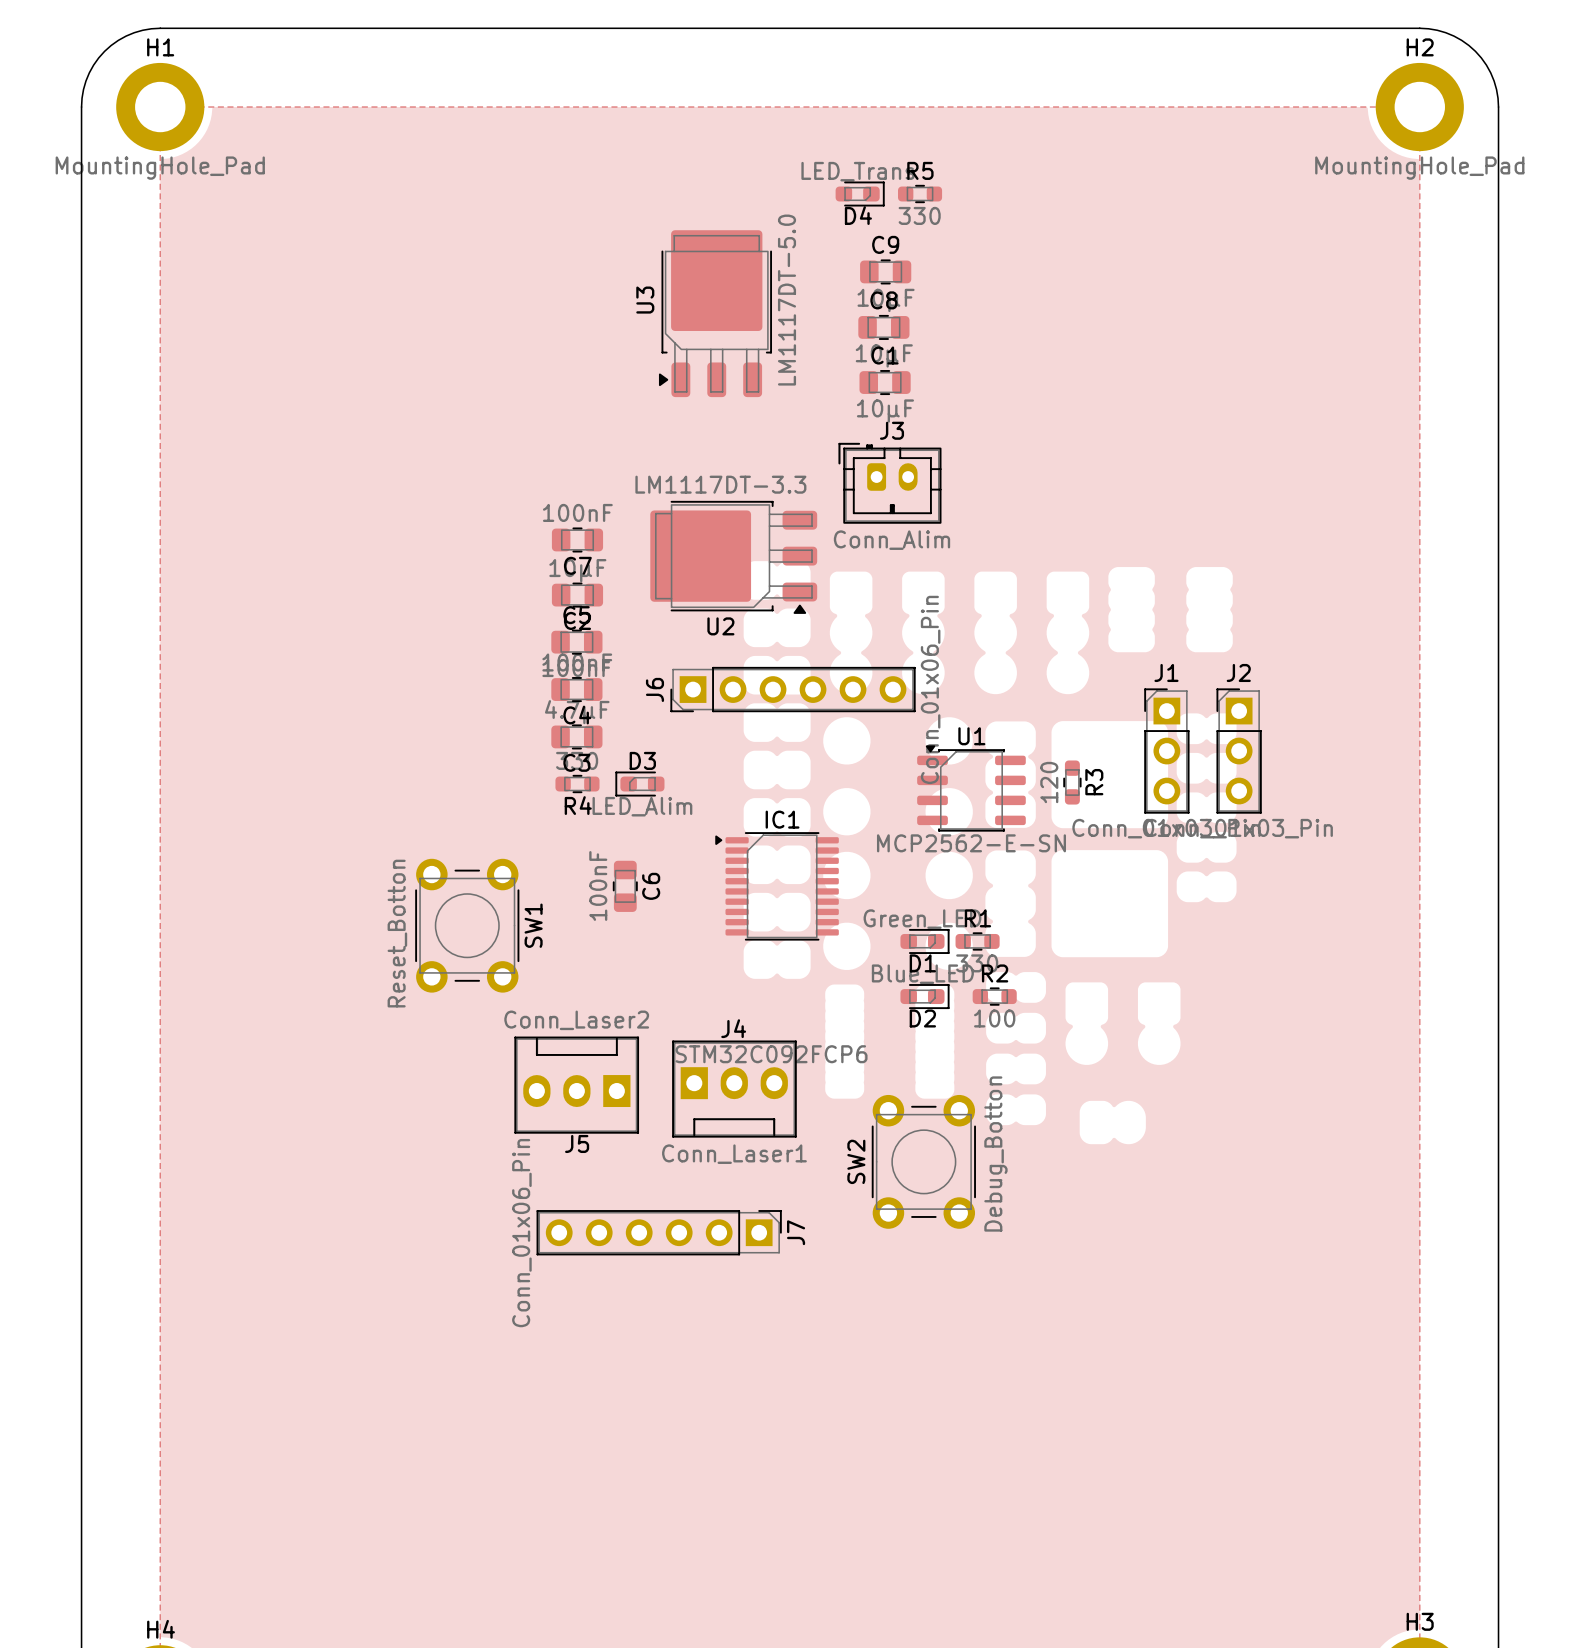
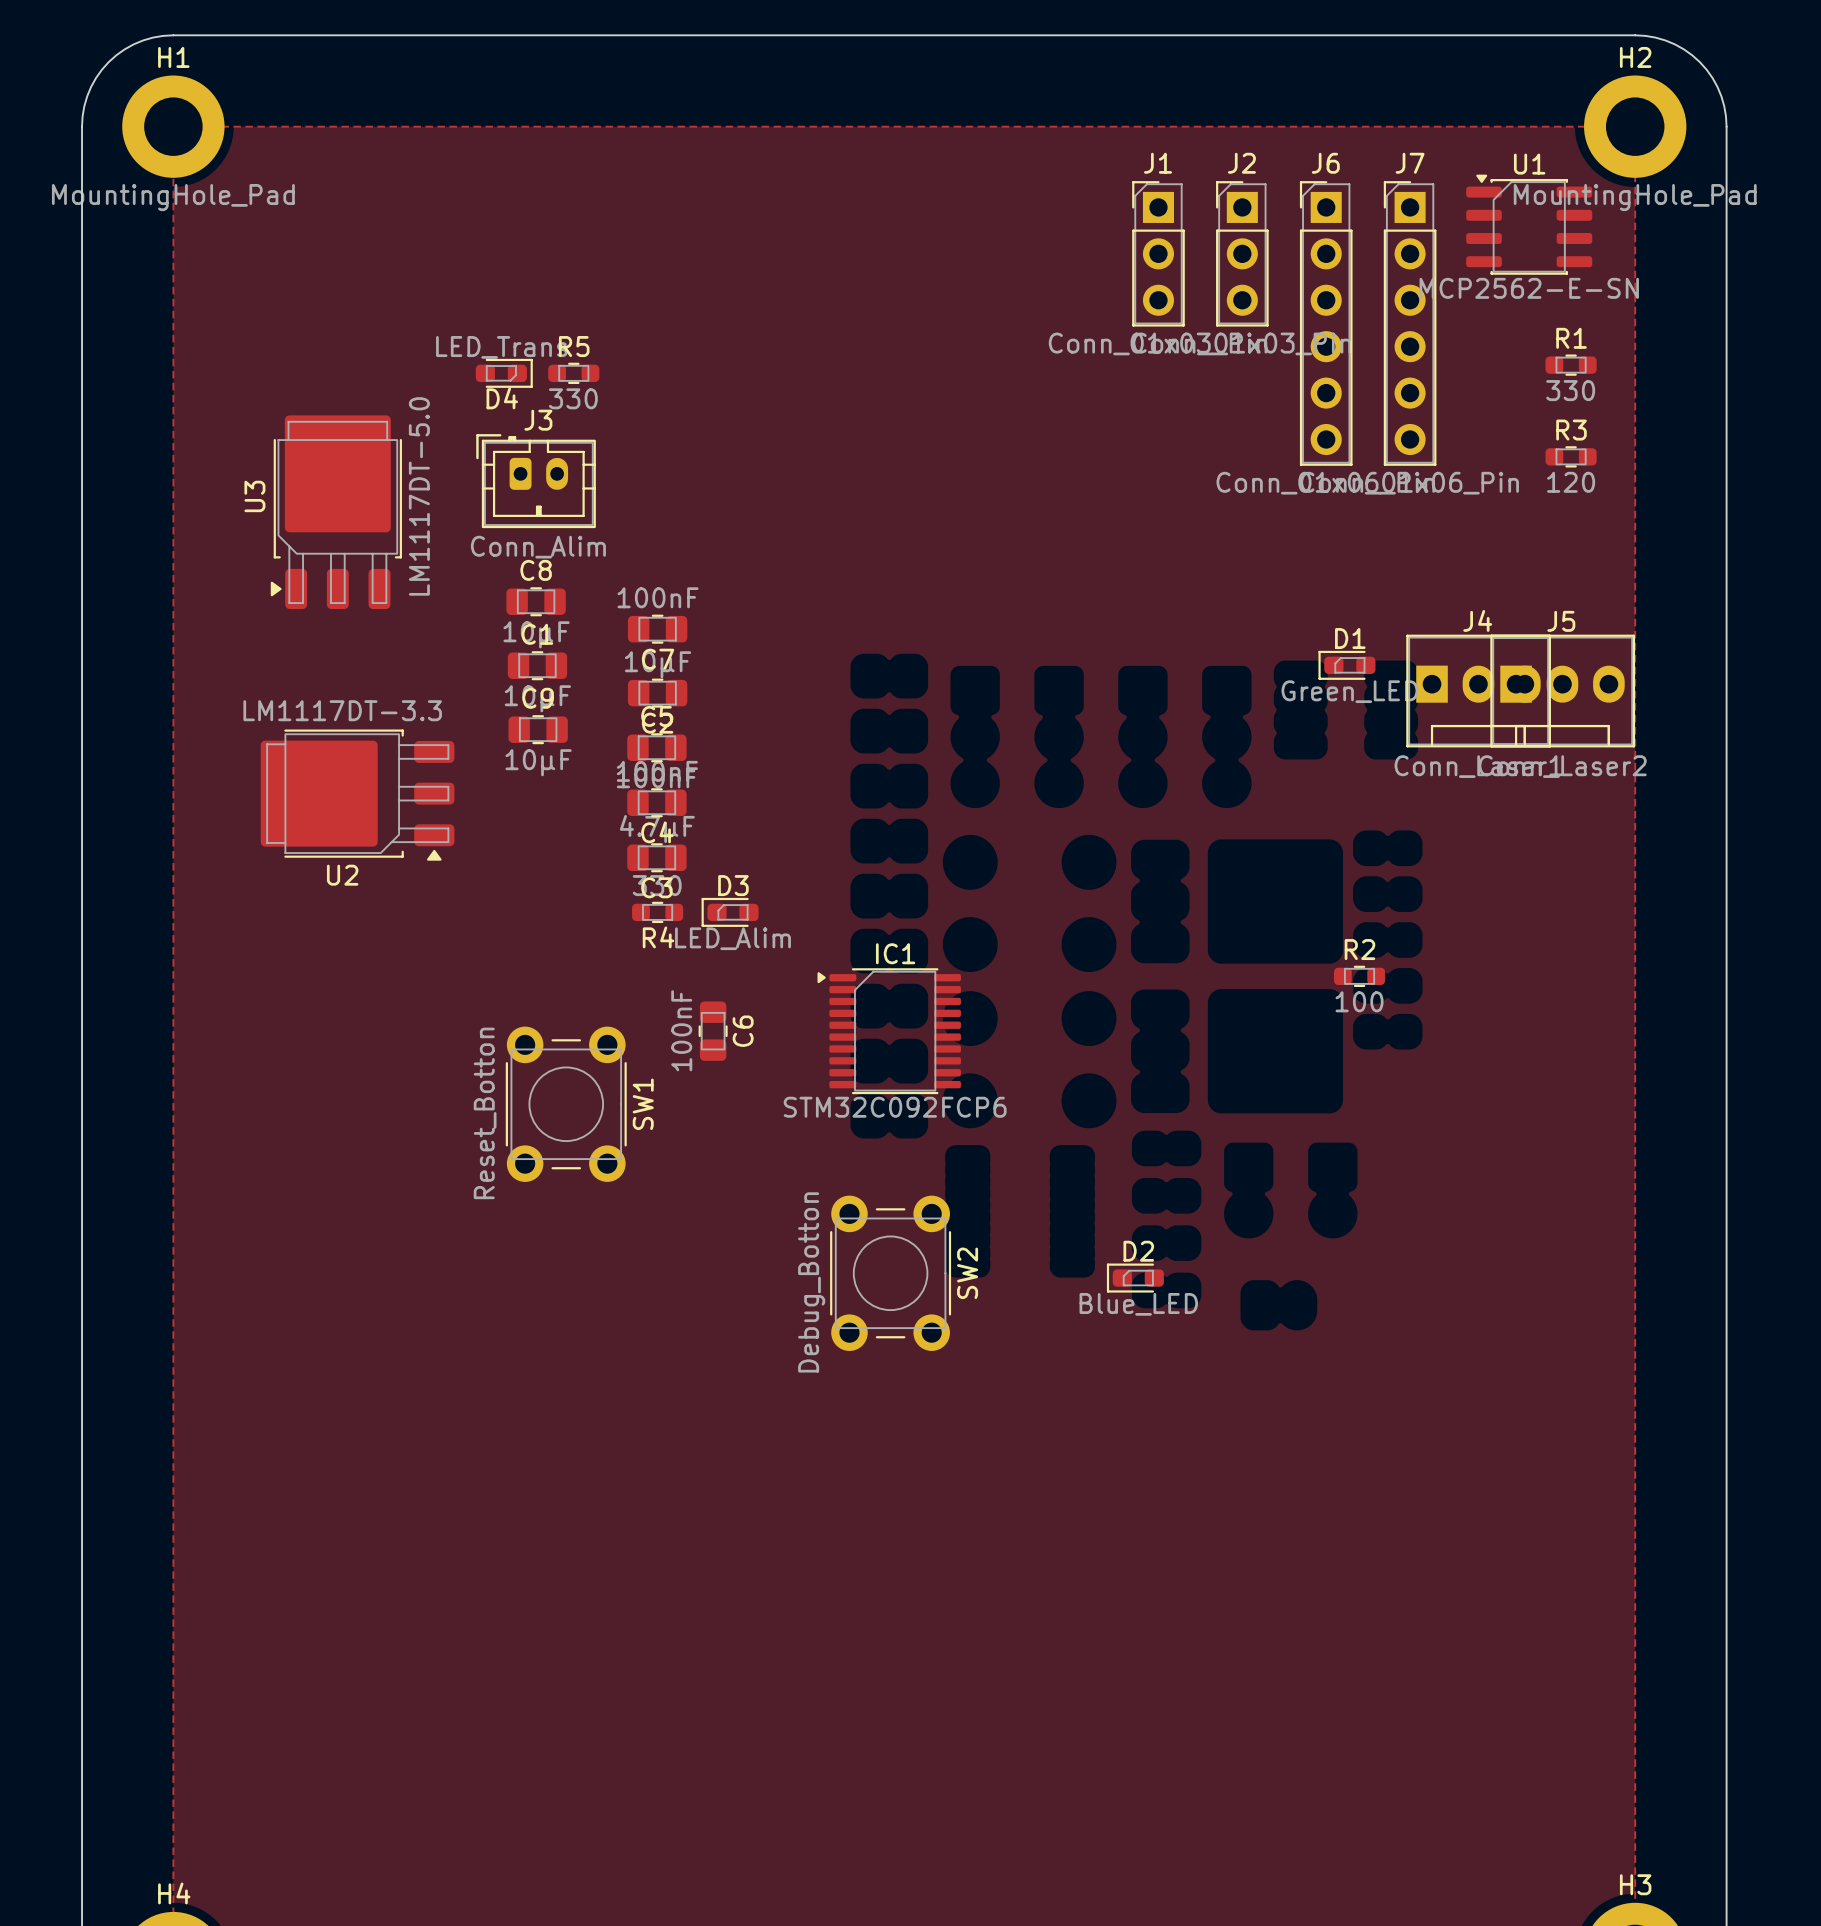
D4 position: (860, 194) -> (504, 373)
R5 position: (920, 194) -> (573, 373)
C9 position: (885, 271) -> (538, 729)
U3 position: (715, 313) -> (336, 512)
C8 position: (883, 327) -> (536, 601)
C1 position: (885, 382) -> (537, 665)
J3 position: (890, 483) -> (536, 481)
U2 position: (733, 557) -> (357, 795)
J6 rotation: 0° (793, 689) -> 90° clockwise (1326, 323)
J6 position: (793, 689) -> (1326, 323)
J1 position: (1166, 751) -> (1158, 253)
J2 position: (1239, 751) -> (1242, 253)
R3 value position: 120 (1049, 782) -> 120 (1571, 482)
R3 rotation: 0° (1072, 782) -> 90° clockwise (1571, 456)
R3 position: (1072, 782) -> (1571, 456)
R3 name position: R3 (1094, 782) -> R3 (1571, 430)
U1 position: (971, 788) -> (1529, 224)
SW1 position: (467, 925) -> (566, 1104)
D1 rotation: 0° (925, 941) -> 180° (1346, 665)
D1 position: (925, 941) -> (1346, 665)
R1 position: (977, 941) -> (1571, 365)
D2 rotation: 0° (925, 996) -> 180° (1135, 1278)
D2 position: (925, 996) -> (1135, 1278)
R2 position: (994, 996) -> (1359, 976)
IC1 value position: STM32C092FCP6 (771, 1054) -> STM32C092FCP6 (895, 1107)
J5 rotation: 0° (576, 1085) -> 180° (1562, 691)
J5 position: (576, 1085) -> (1562, 691)
J4 position: (734, 1089) -> (1478, 691)
SW2 rotation: 0° (923, 1161) -> 180° (890, 1273)
SW2 position: (923, 1161) -> (890, 1273)
J7 rotation: 0° (659, 1232) -> 90° counterclockwise (1410, 323)
J7 position: (659, 1232) -> (1410, 323)

